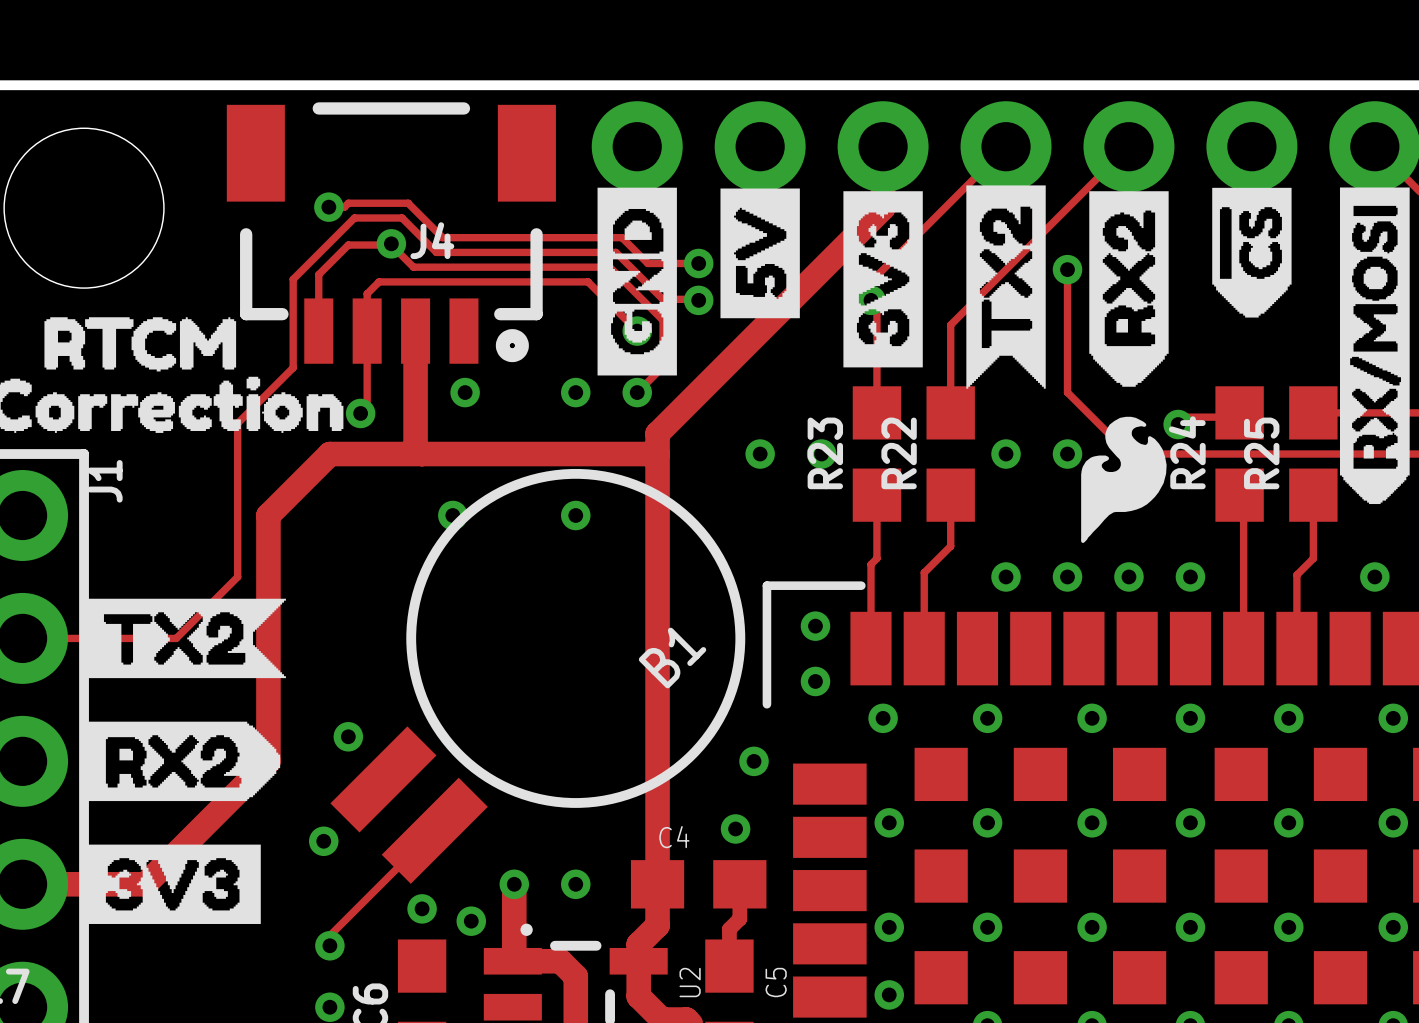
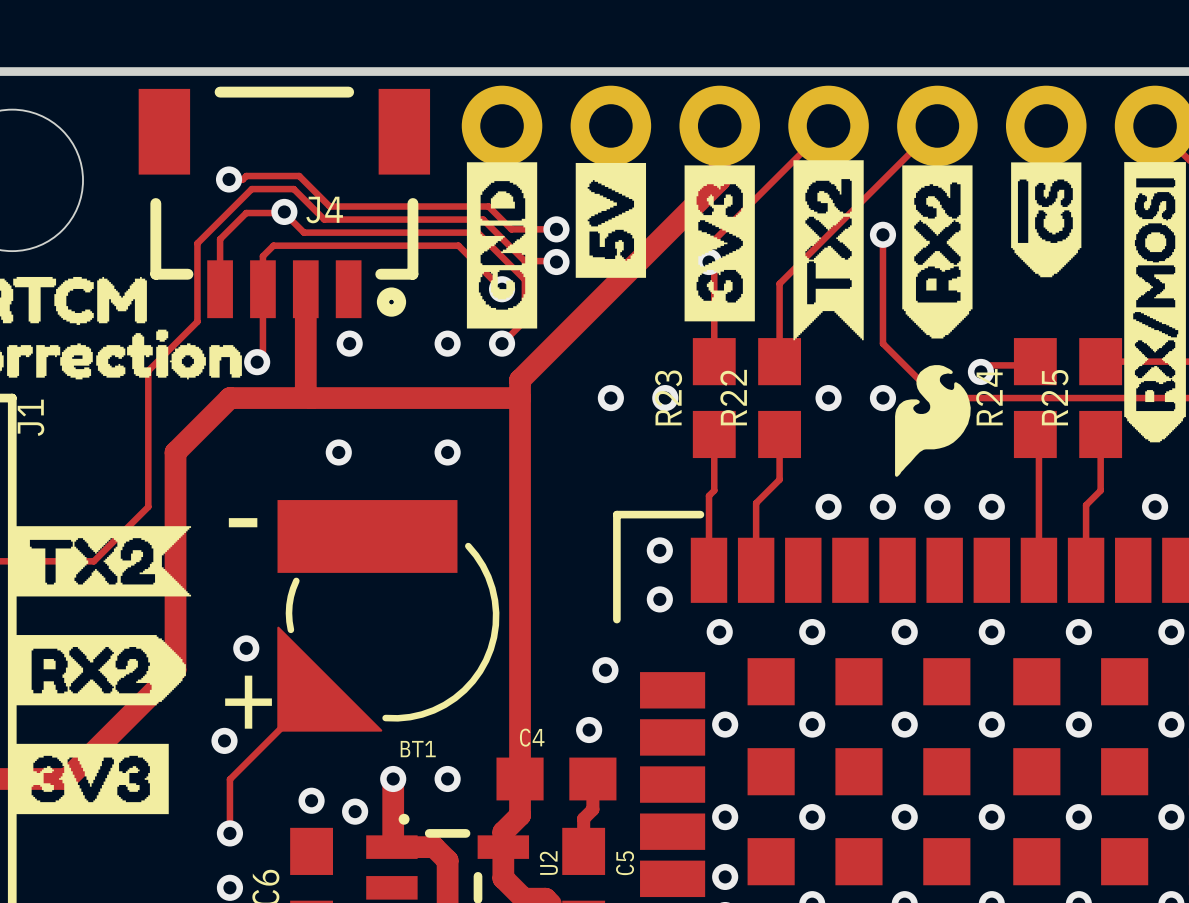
text: none -> - (243, 522)
B1: (537, 676) -> none
BT1: none -> (388, 615)
text: none -> + (248, 702)
track: (434, 830) (329, 935) -> (306, 702) (229, 779) (229, 824)

